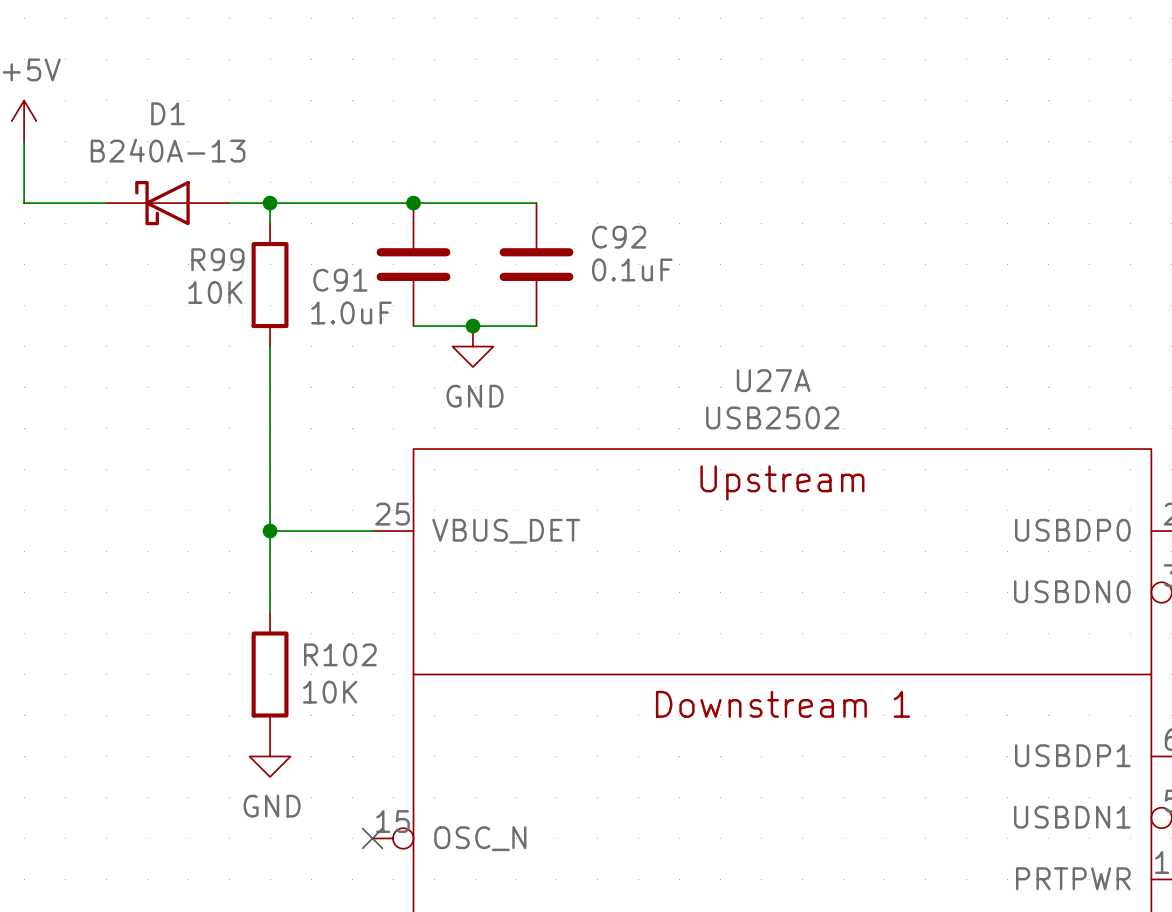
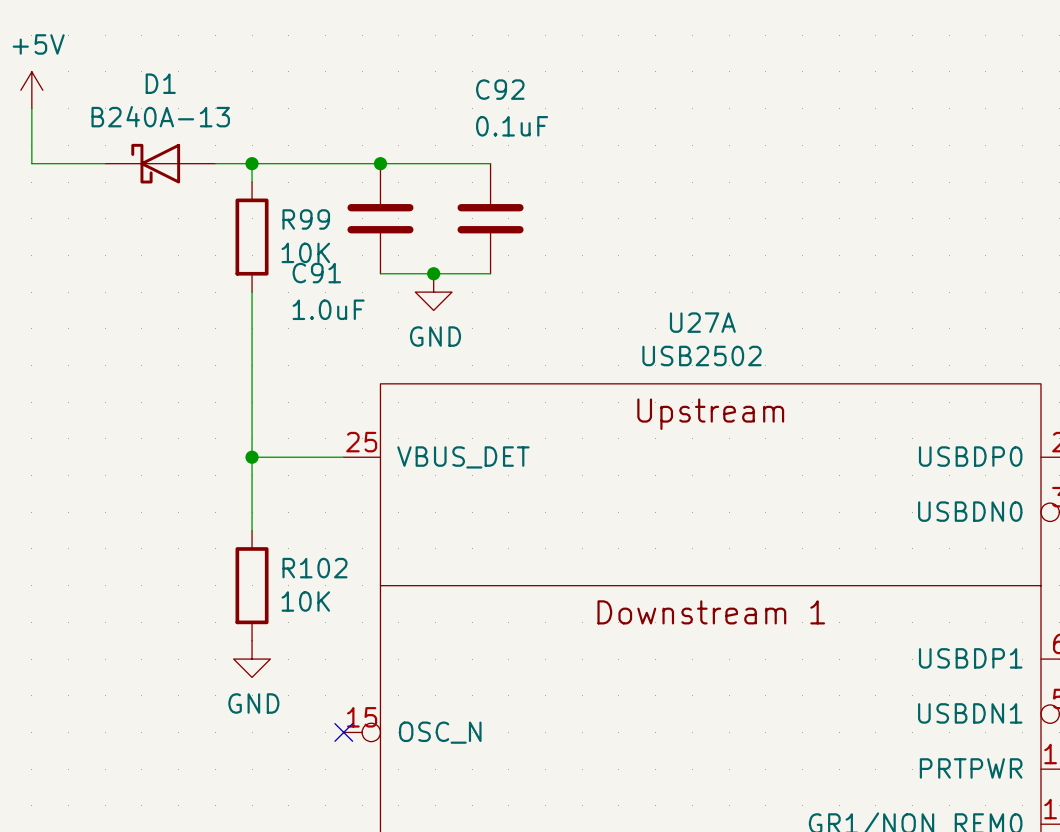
C92 name position: C92 (619, 237) -> C92 (500, 89)
R99 name position: R99 (217, 259) -> R99 (306, 219)
C92 value position: 0.1uF (632, 269) -> 0.1uF (512, 126)
C91 name position: C91 (340, 280) -> C91 (316, 273)
R99 value position: 10K (215, 292) -> 10K (305, 252)
C91 value position: 1.0uF (351, 313) -> 1.0uF (328, 309)

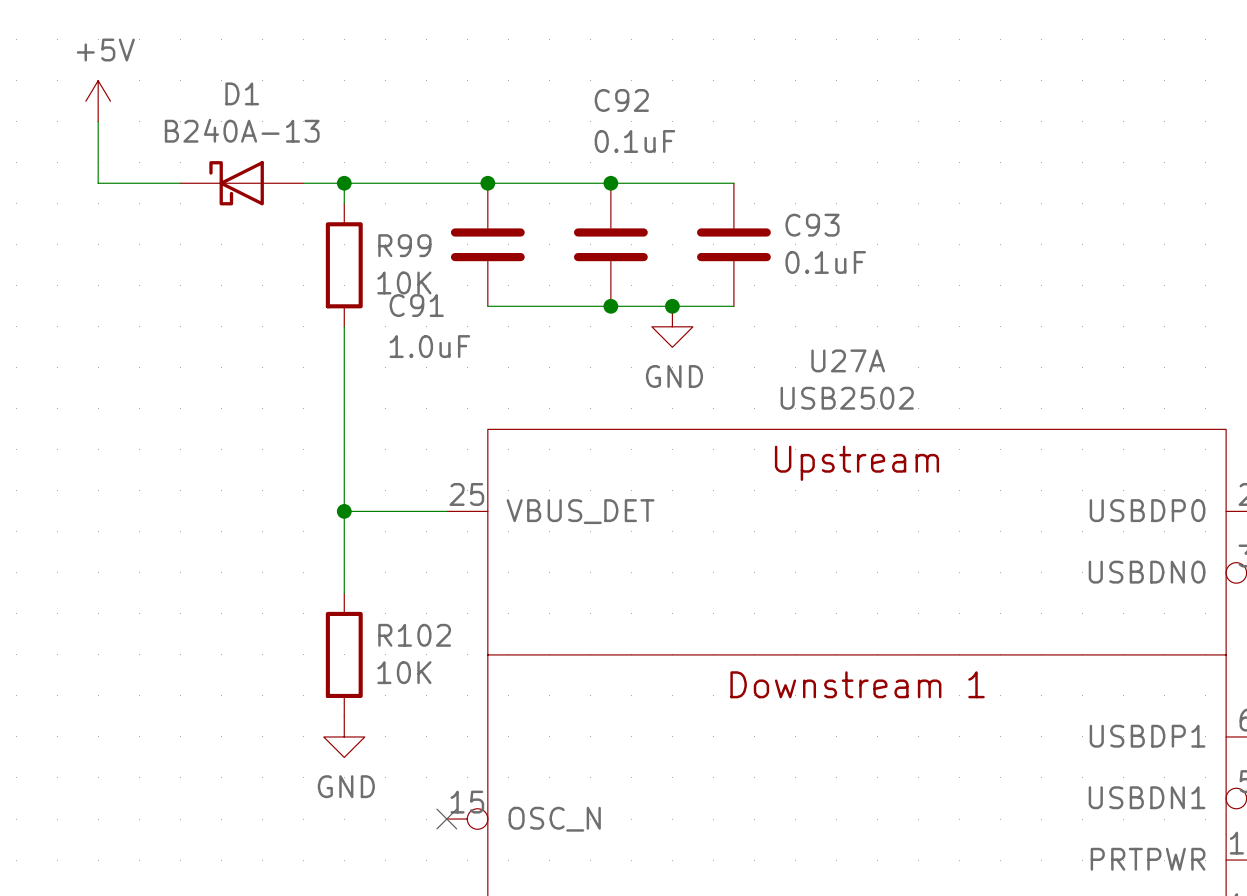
wire: none -> (610, 183) (733, 183)
junction: none -> (610, 183)
C93: none -> 0.1uF (733, 244)
junction: (433, 273) -> none
wire: none -> (610, 306) (733, 306)
junction: none -> (610, 306)
junction: none -> (672, 306)
power symbol position: GND (433, 292) -> GND (672, 326)

